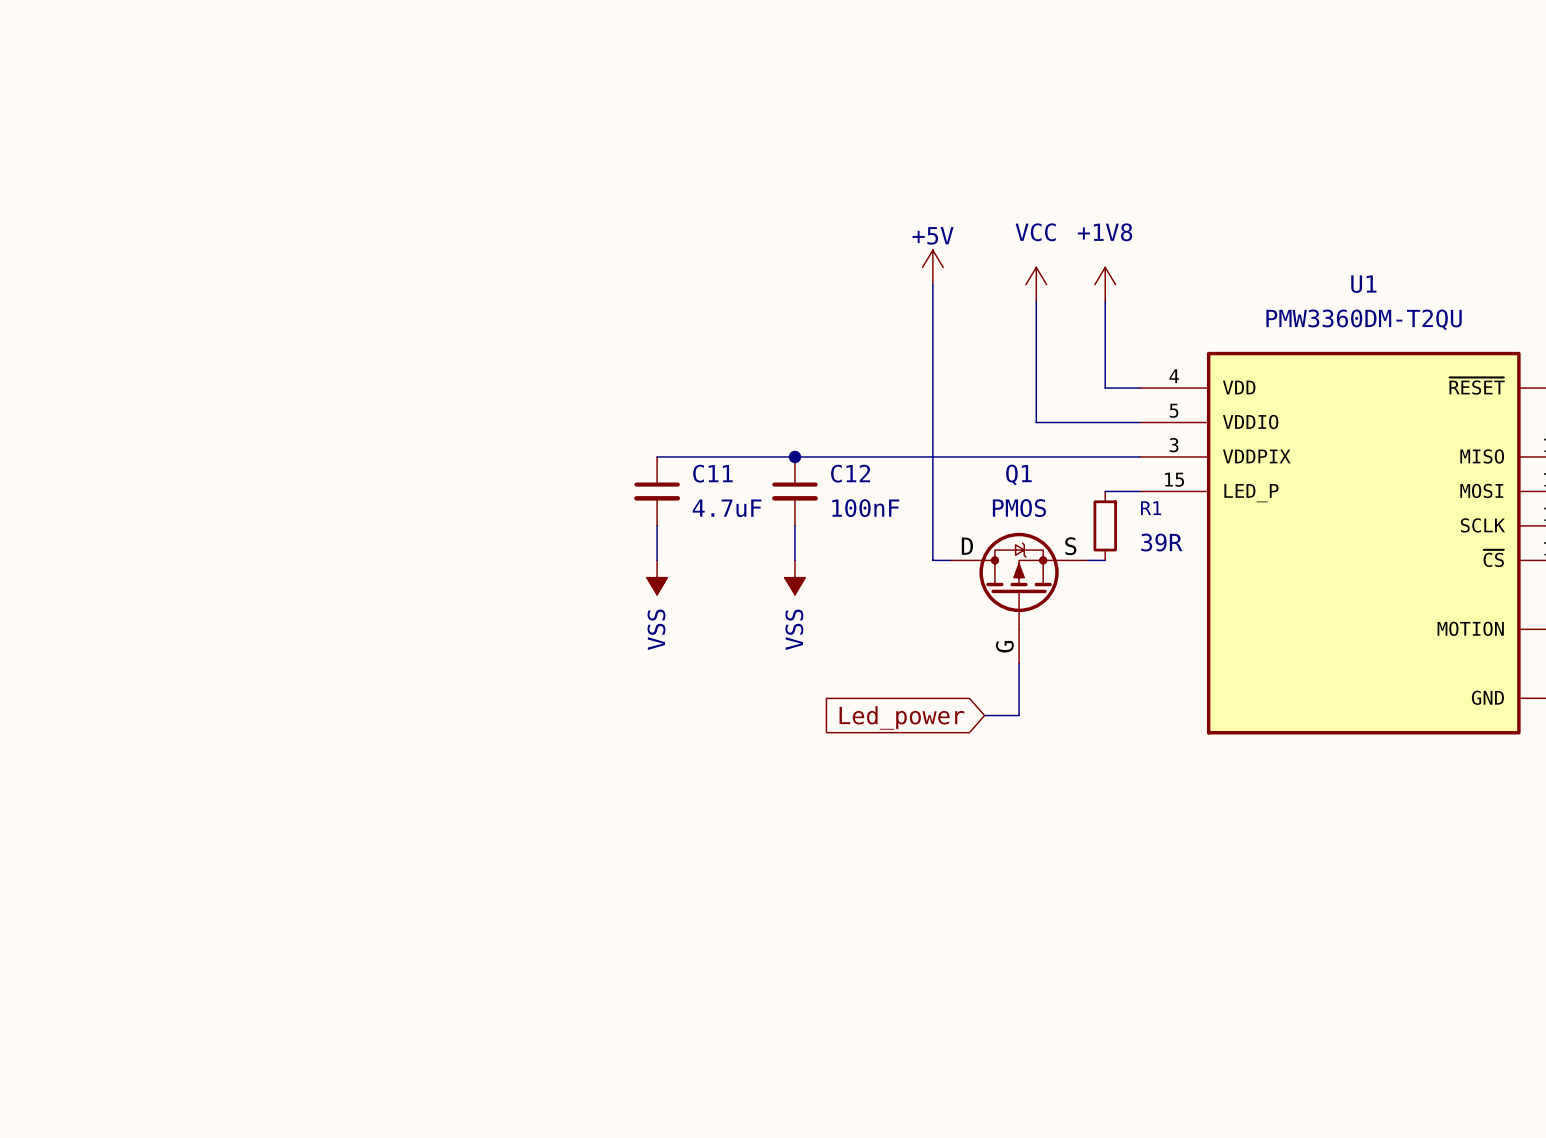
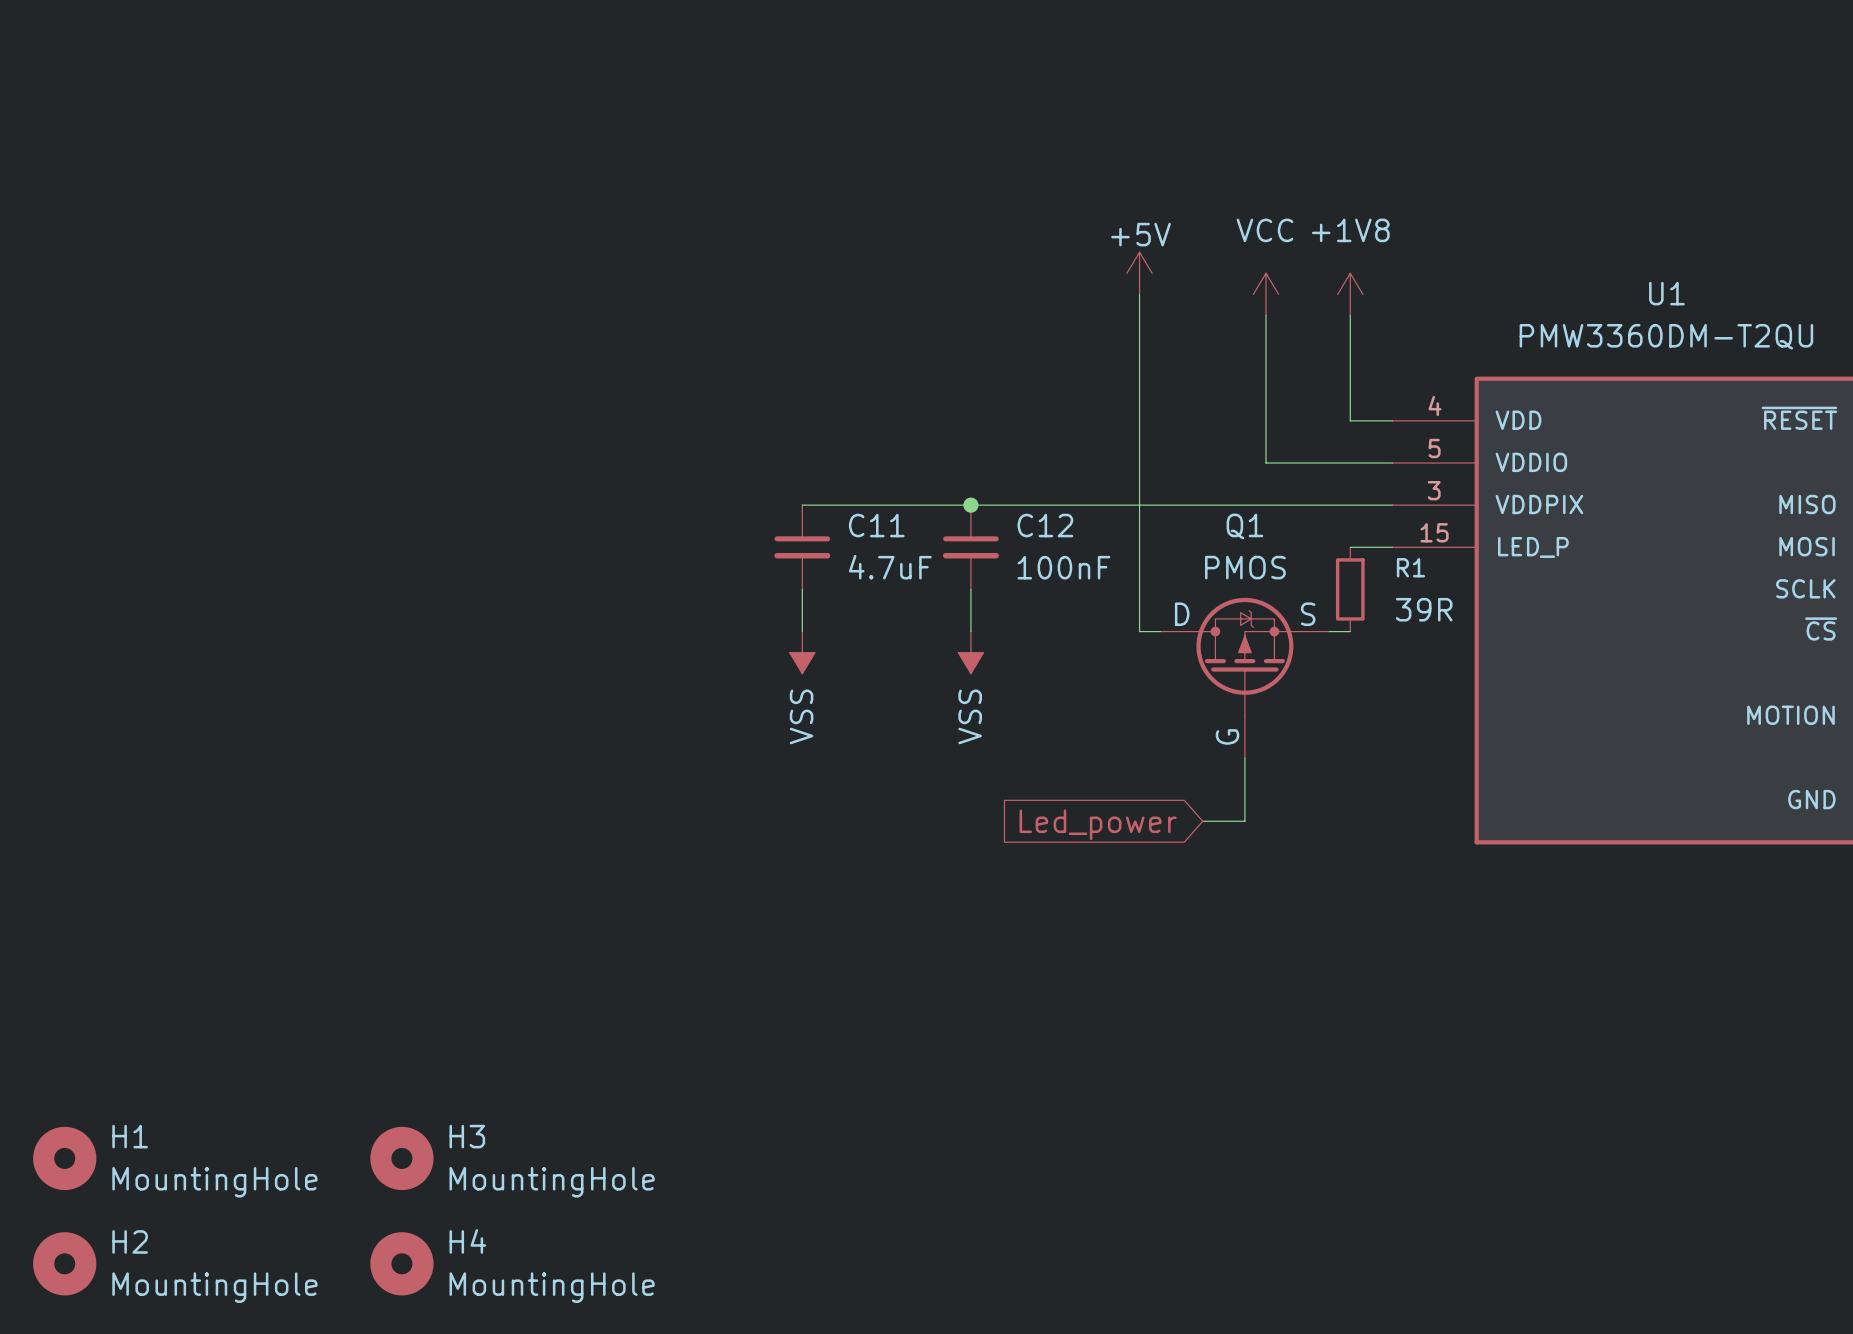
H1: none -> MountingHole (64, 1158)
H3: none -> MountingHole (401, 1158)
H2: none -> MountingHole (64, 1263)
H4: none -> MountingHole (401, 1263)

